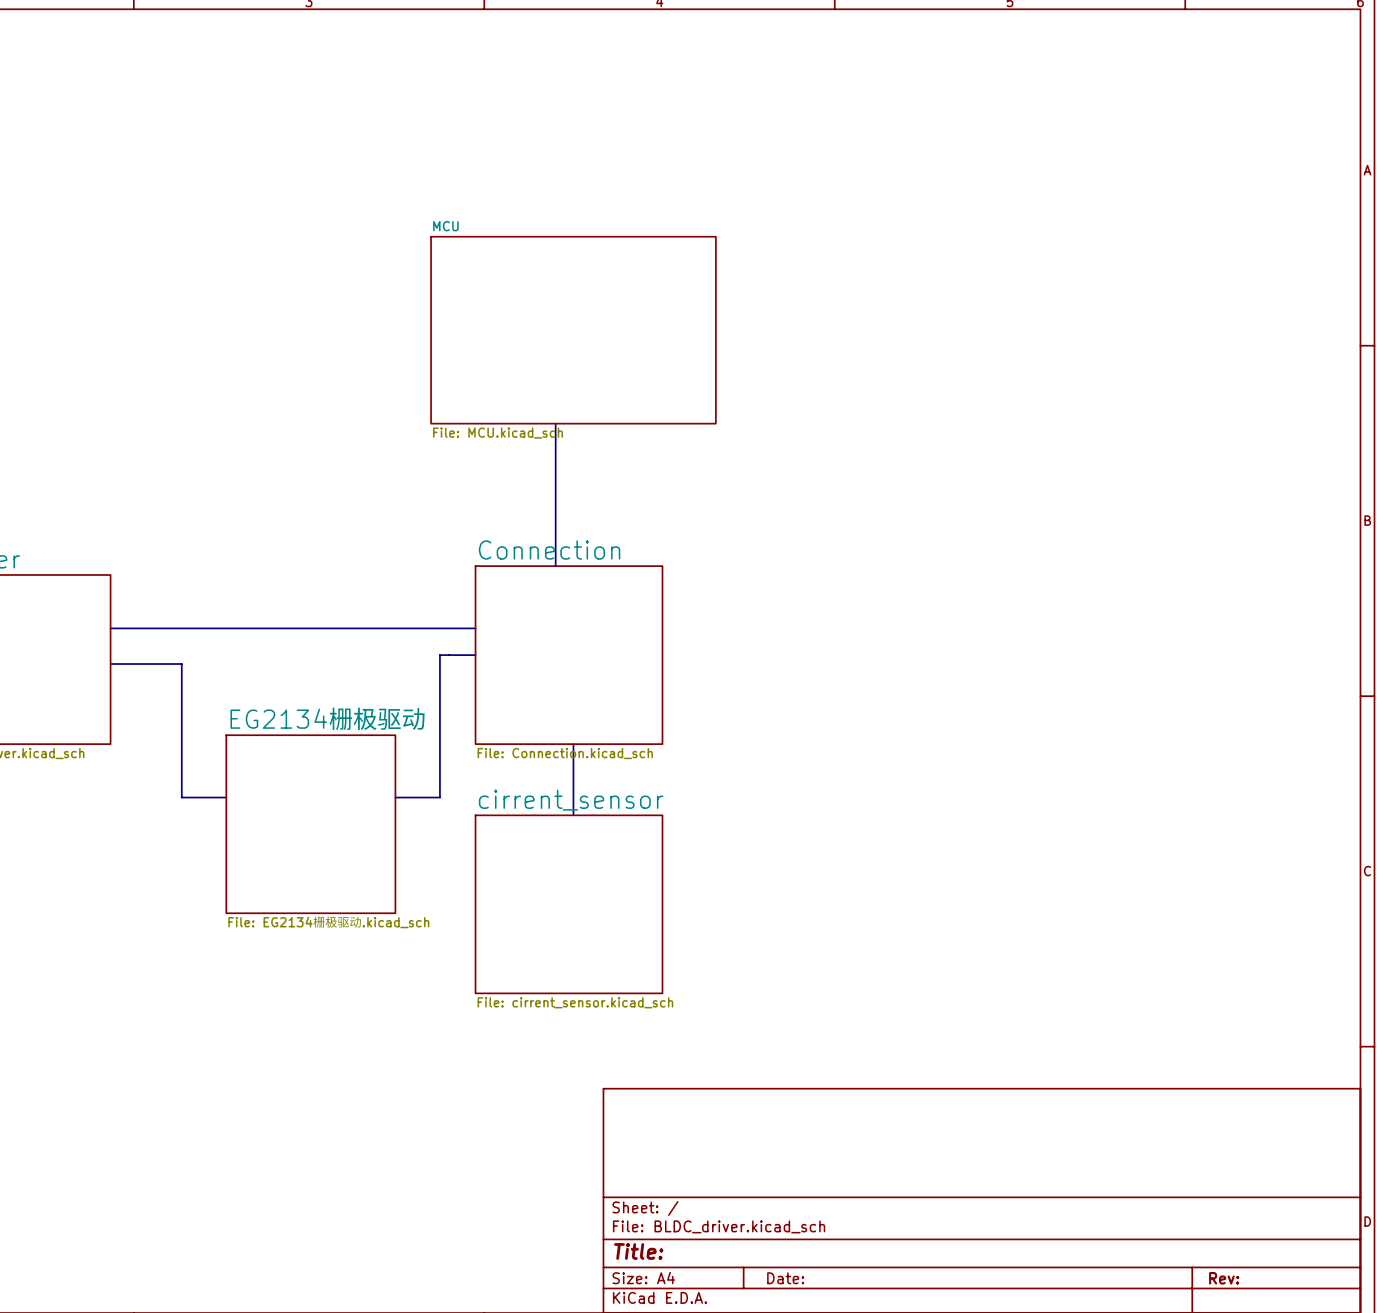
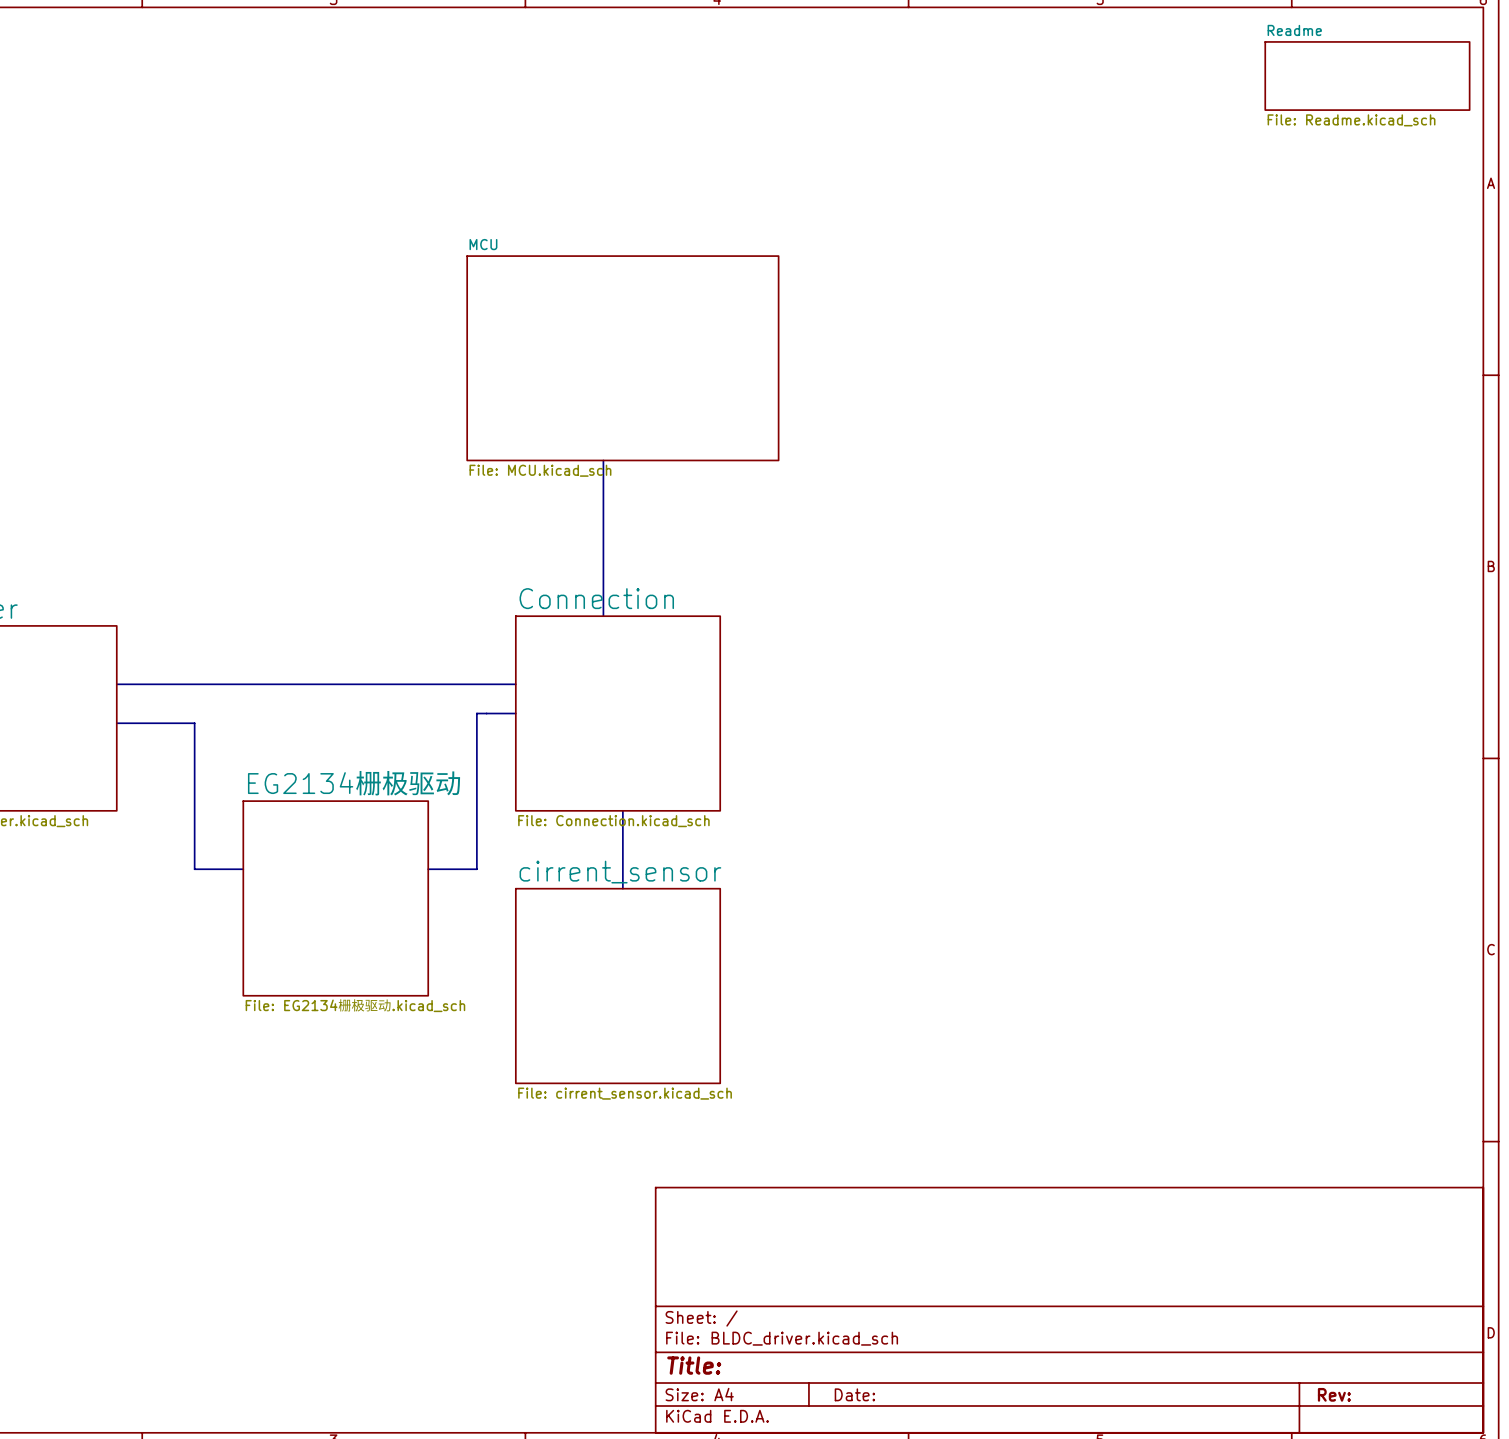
sheet Readme: none -> File: Readme.kicad_sch (1367, 76)

